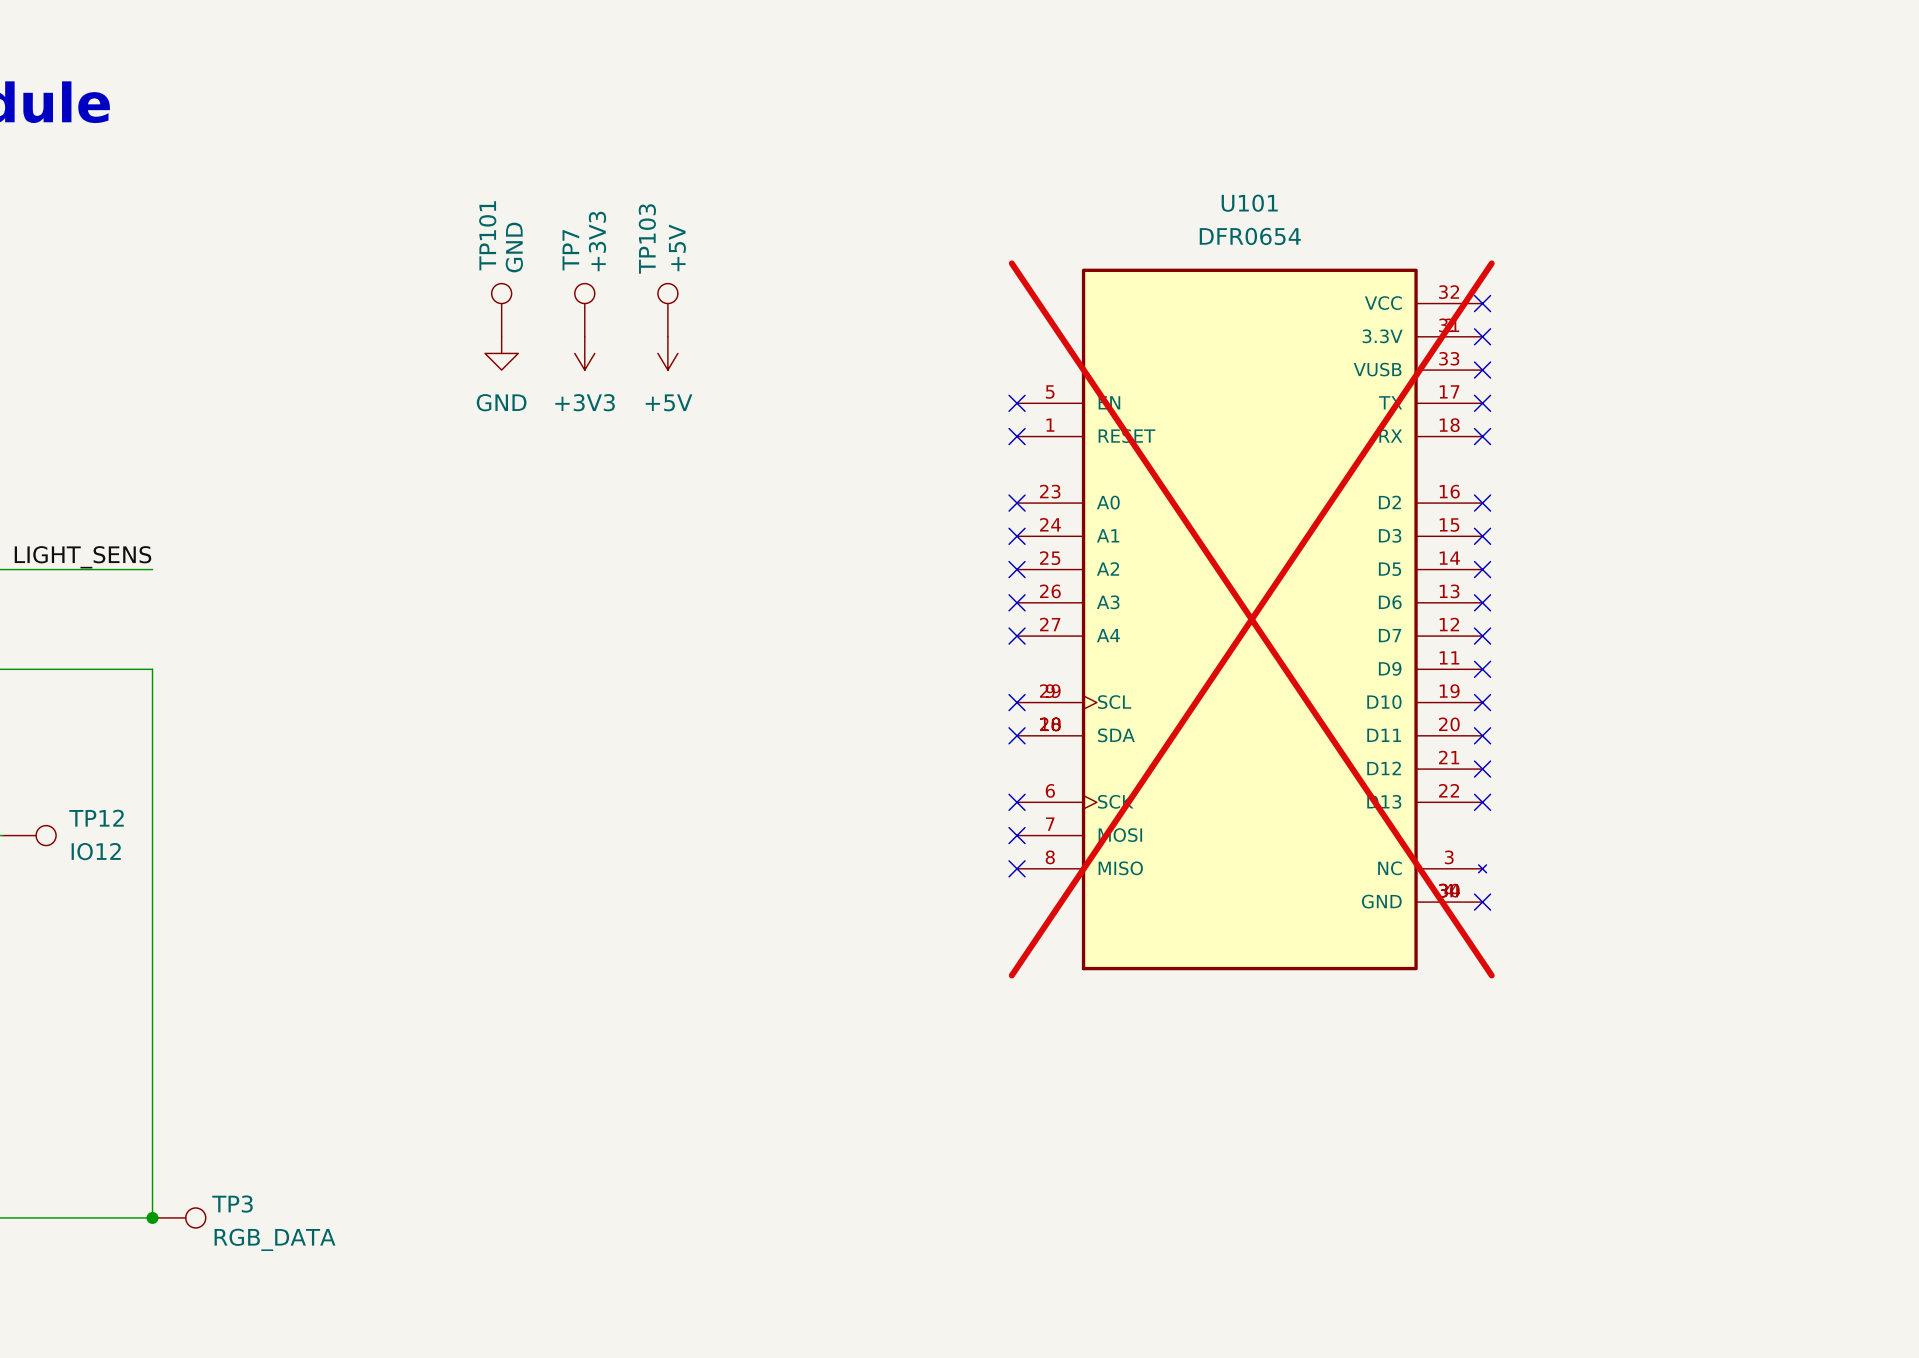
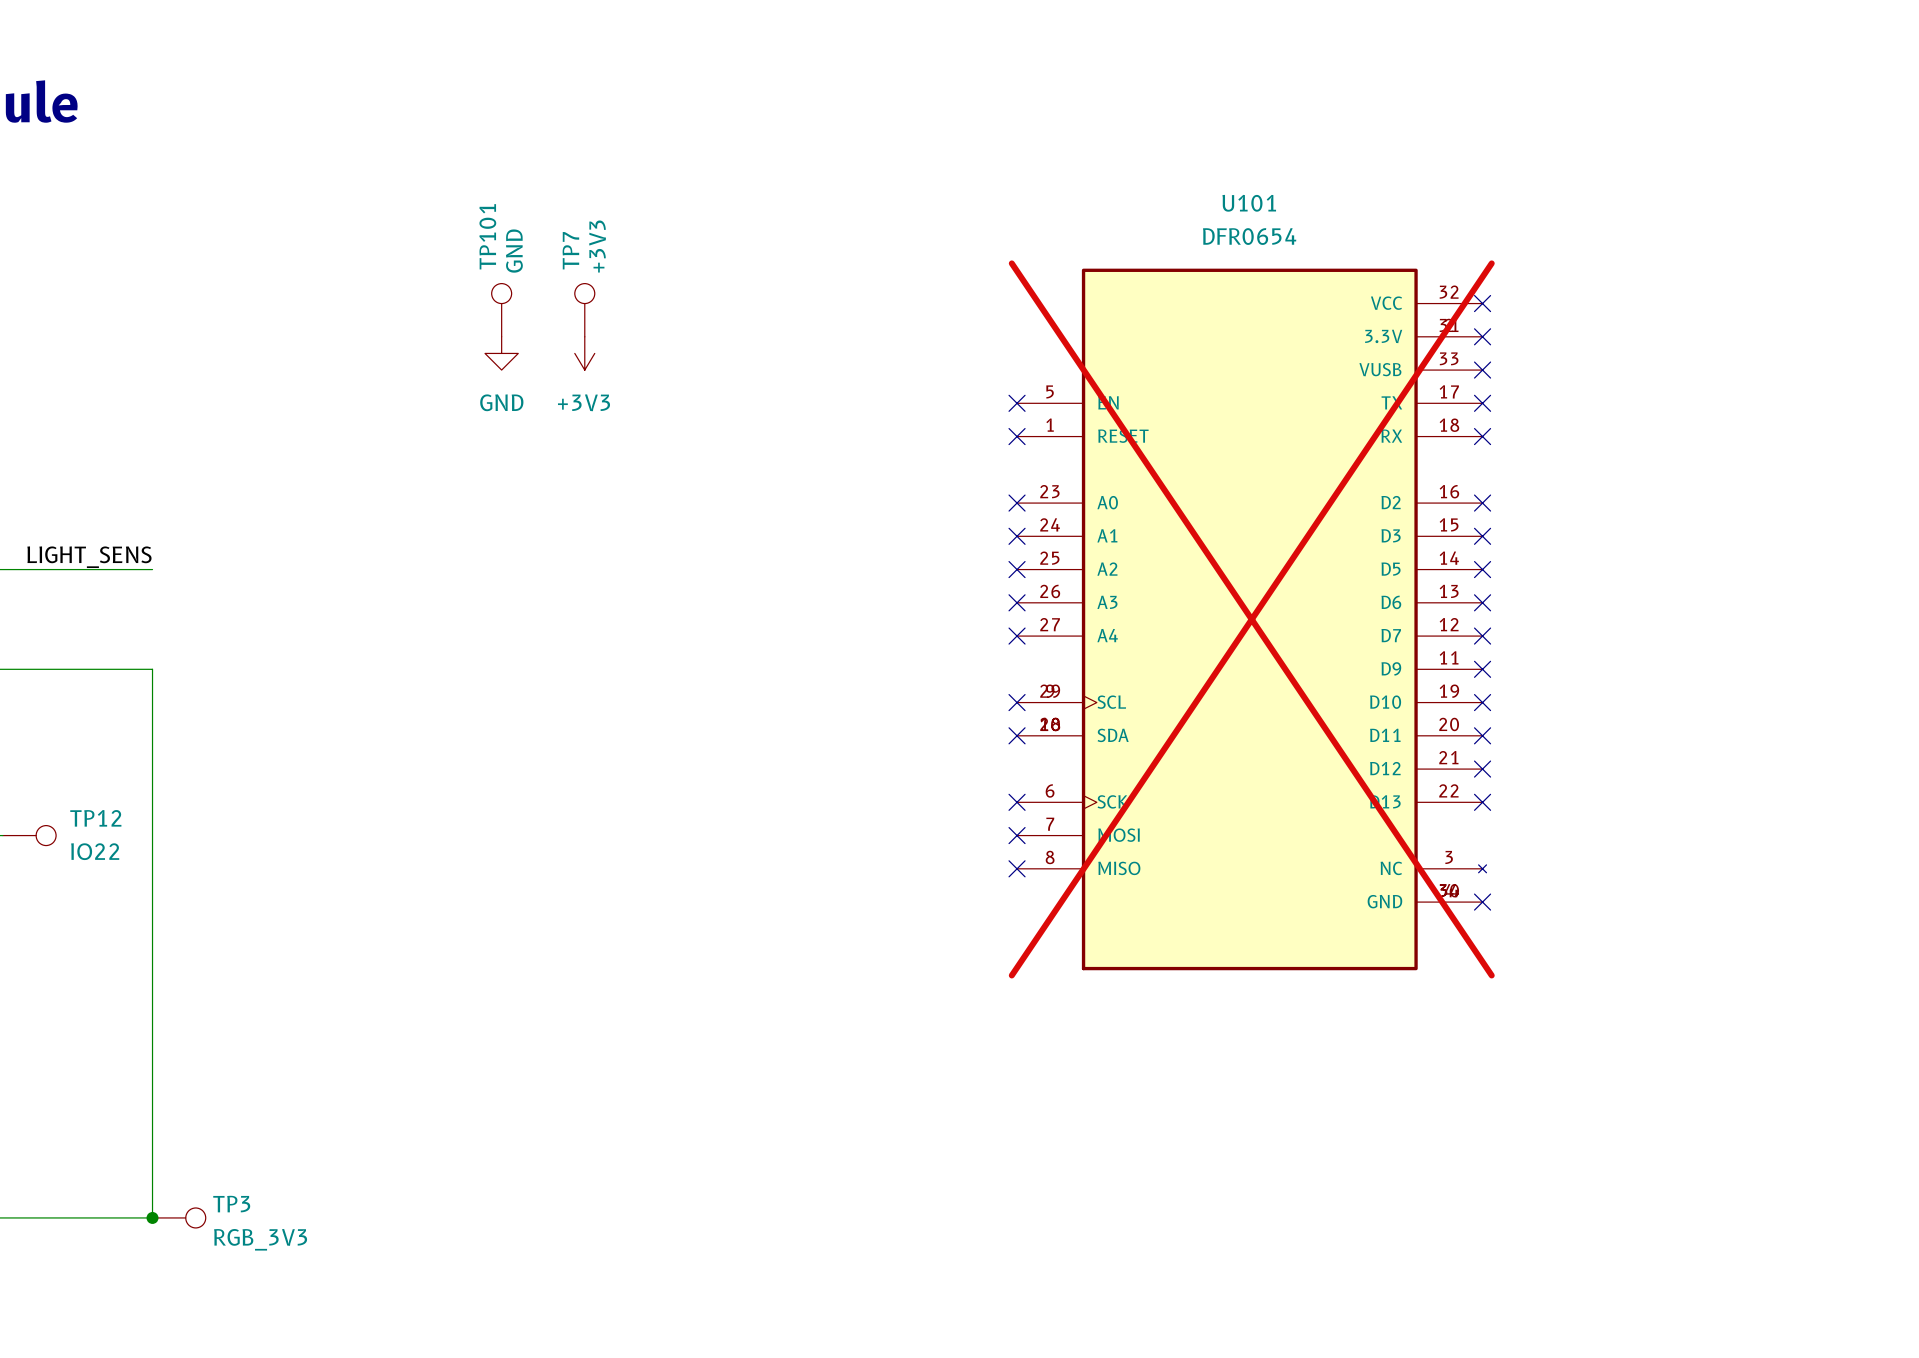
TP103: +5V (667, 310) -> none
power symbol: +5V (667, 353) -> none
TP12 value: IO12 (96, 851) -> IO22 (95, 851)
TP3 value: RGB_DATA (275, 1239) -> RGB_3V3 (260, 1239)

